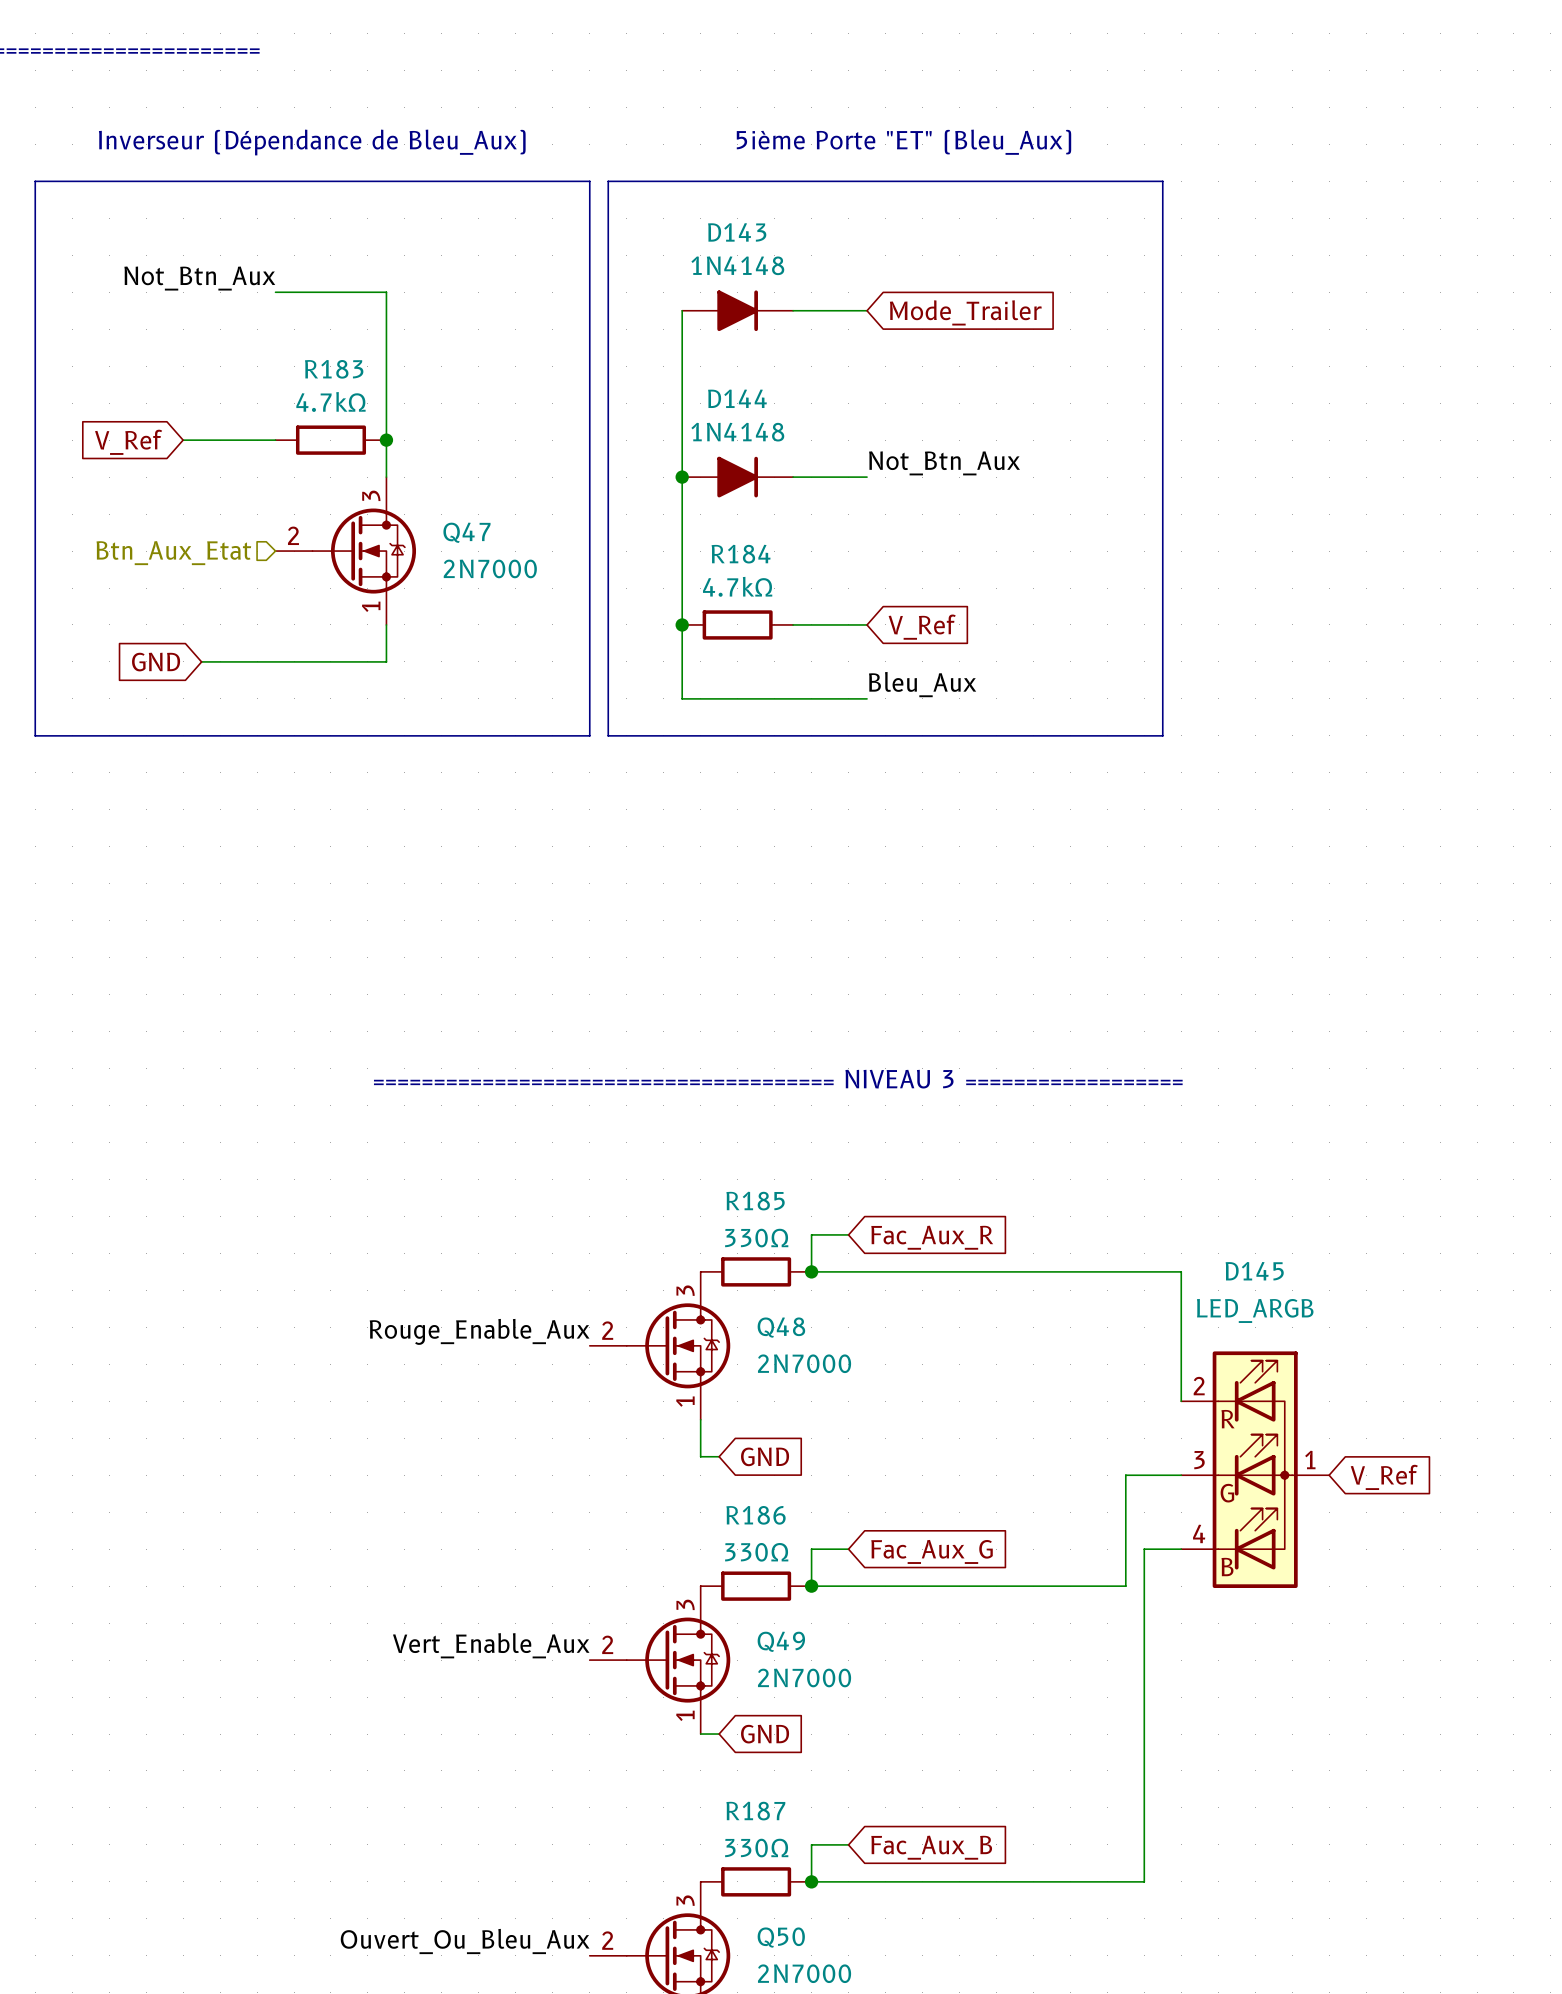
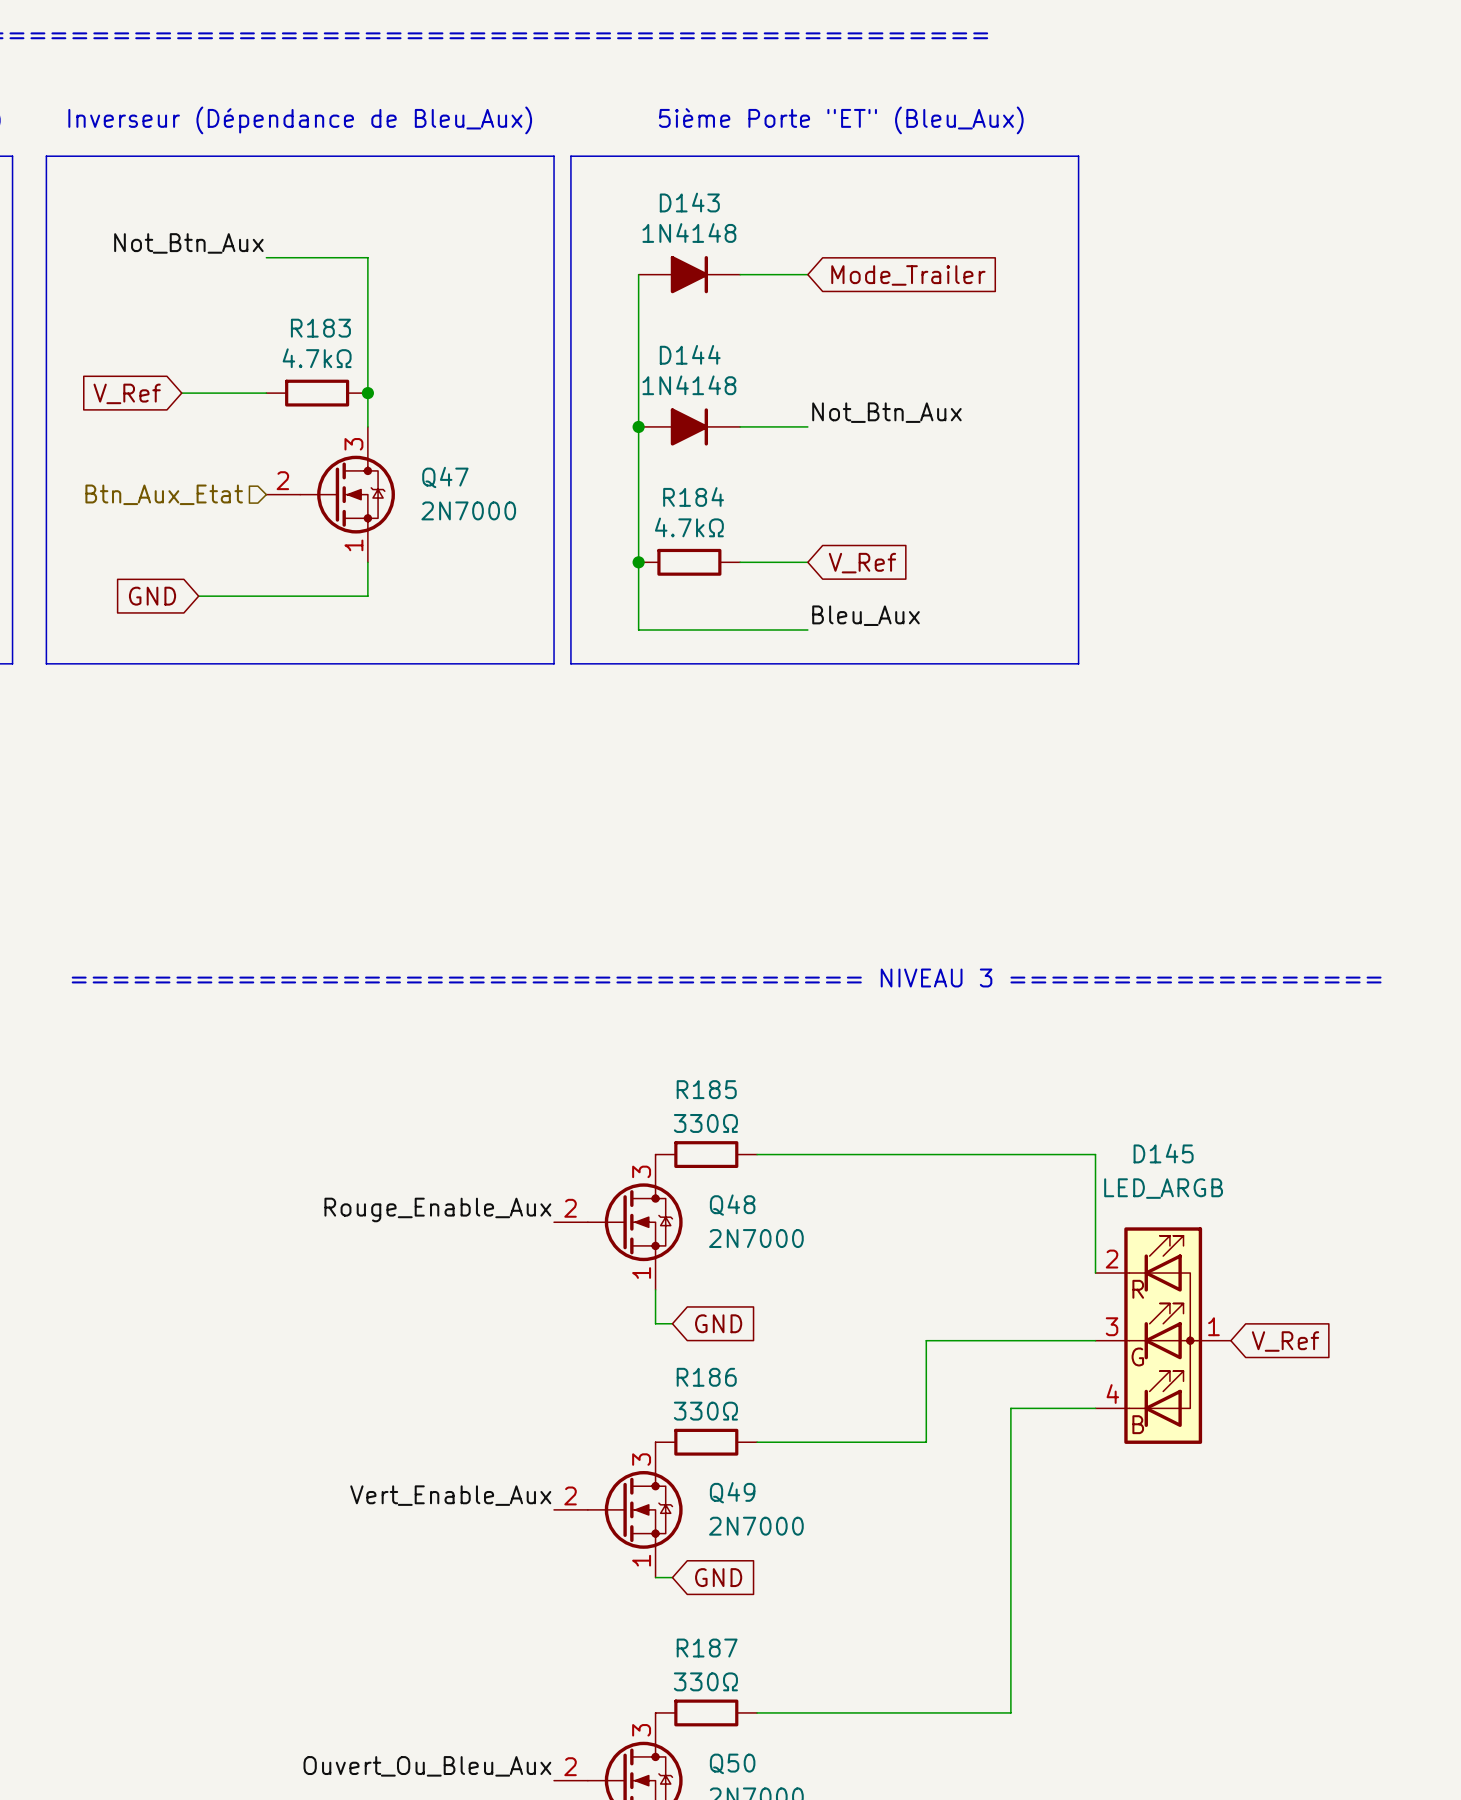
wire: (848, 1234) (811, 1234) (811, 1271) -> none
global label: Fac_Aux_R (932, 1237) -> none
junction: (811, 1271) -> none
wire: (1125, 1475) (1125, 1586) (996, 1586) -> (1044, 1340) (926, 1340) (926, 1442)
wire: (848, 1549) (811, 1549) (811, 1586) -> none
wire: (1144, 1549) (1144, 1881) (1088, 1881) -> (1061, 1408) (1010, 1408) (1010, 1712)
global label: Fac_Aux_G (932, 1551) -> none
junction: (811, 1586) -> none
wire: (848, 1844) (811, 1844) (811, 1881) -> none
global label: Fac_Aux_B (931, 1847) -> none
junction: (811, 1881) -> none

